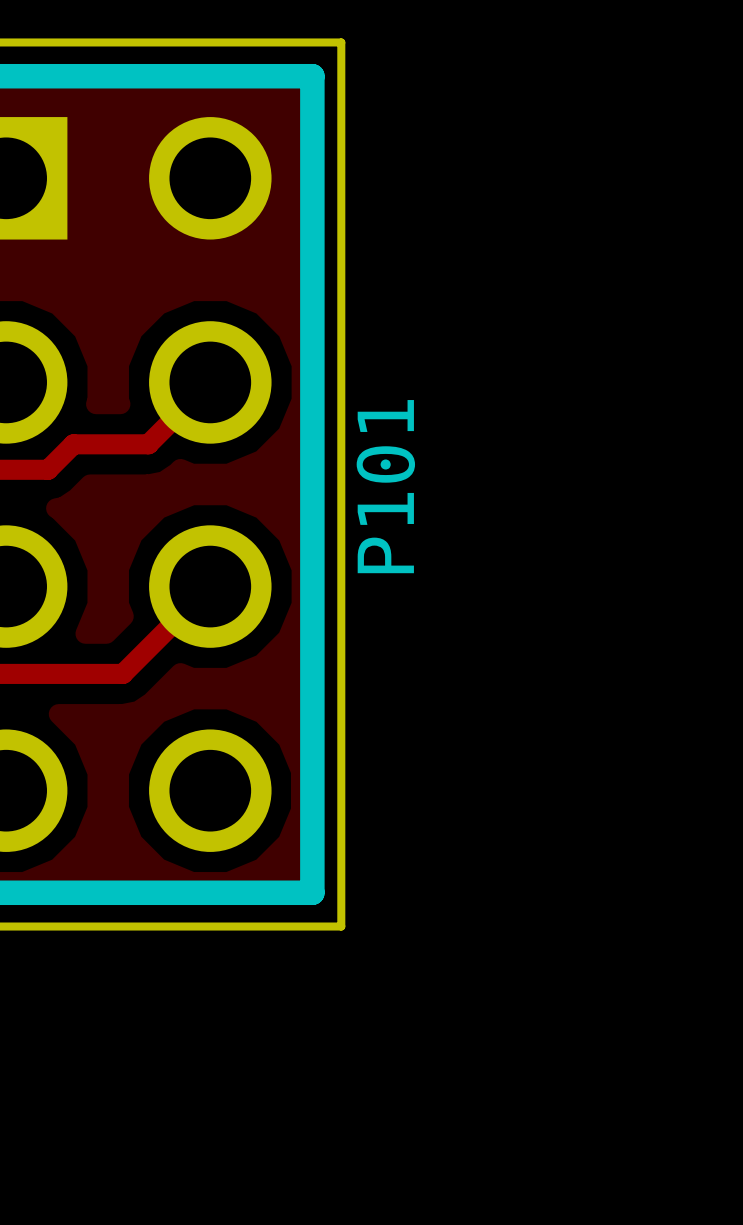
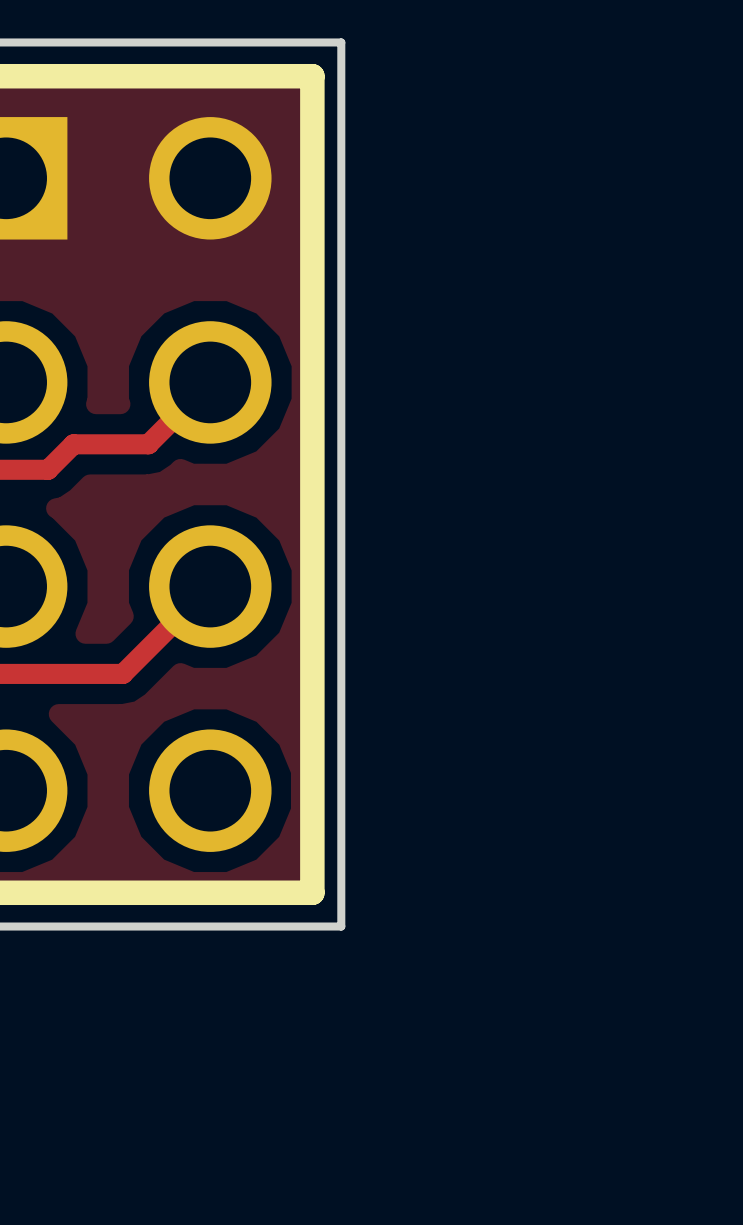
P101 name: P101 (385, 486) -> none

